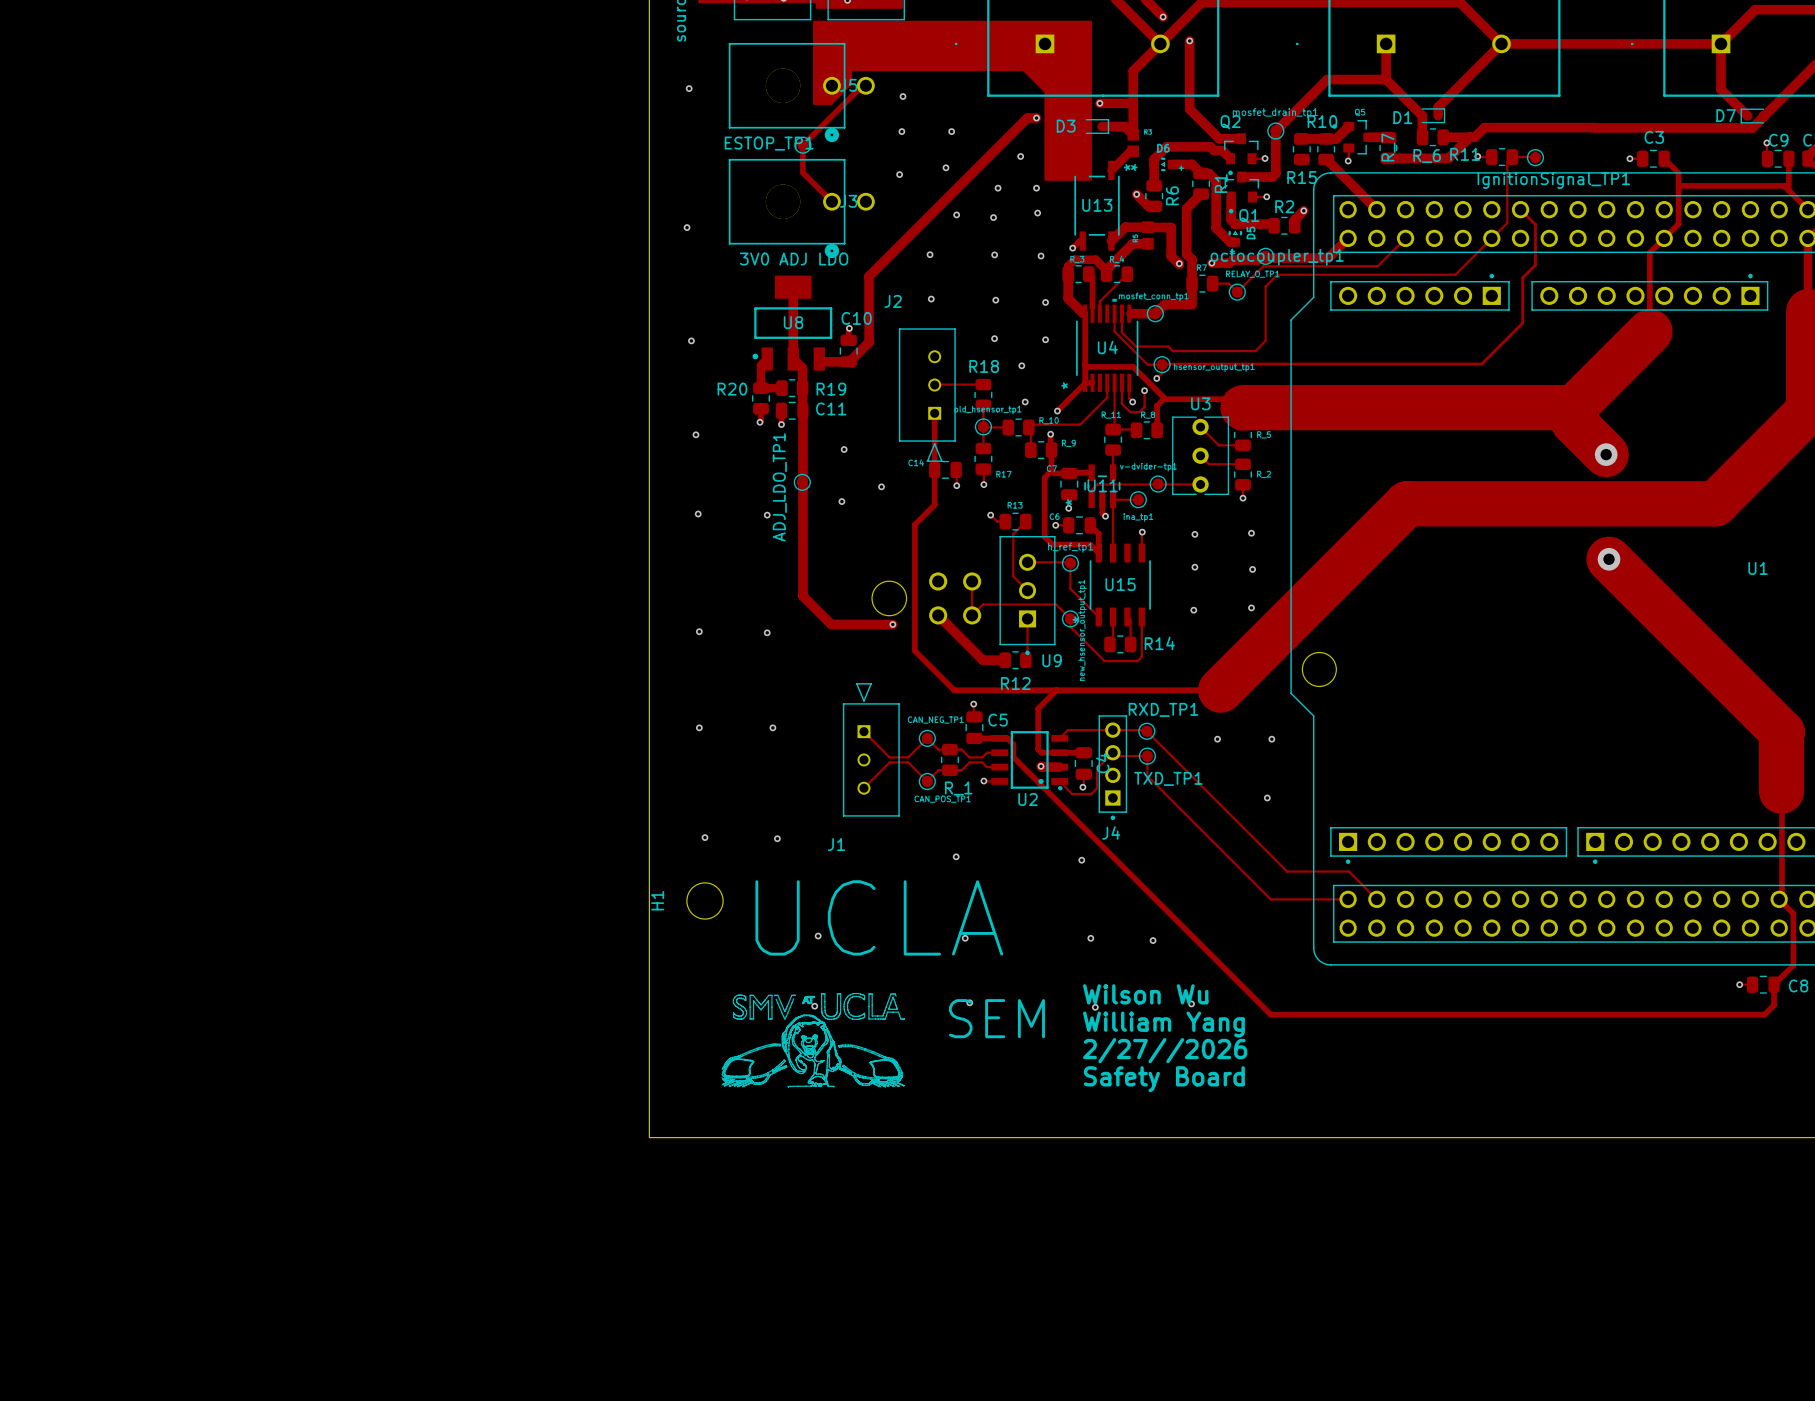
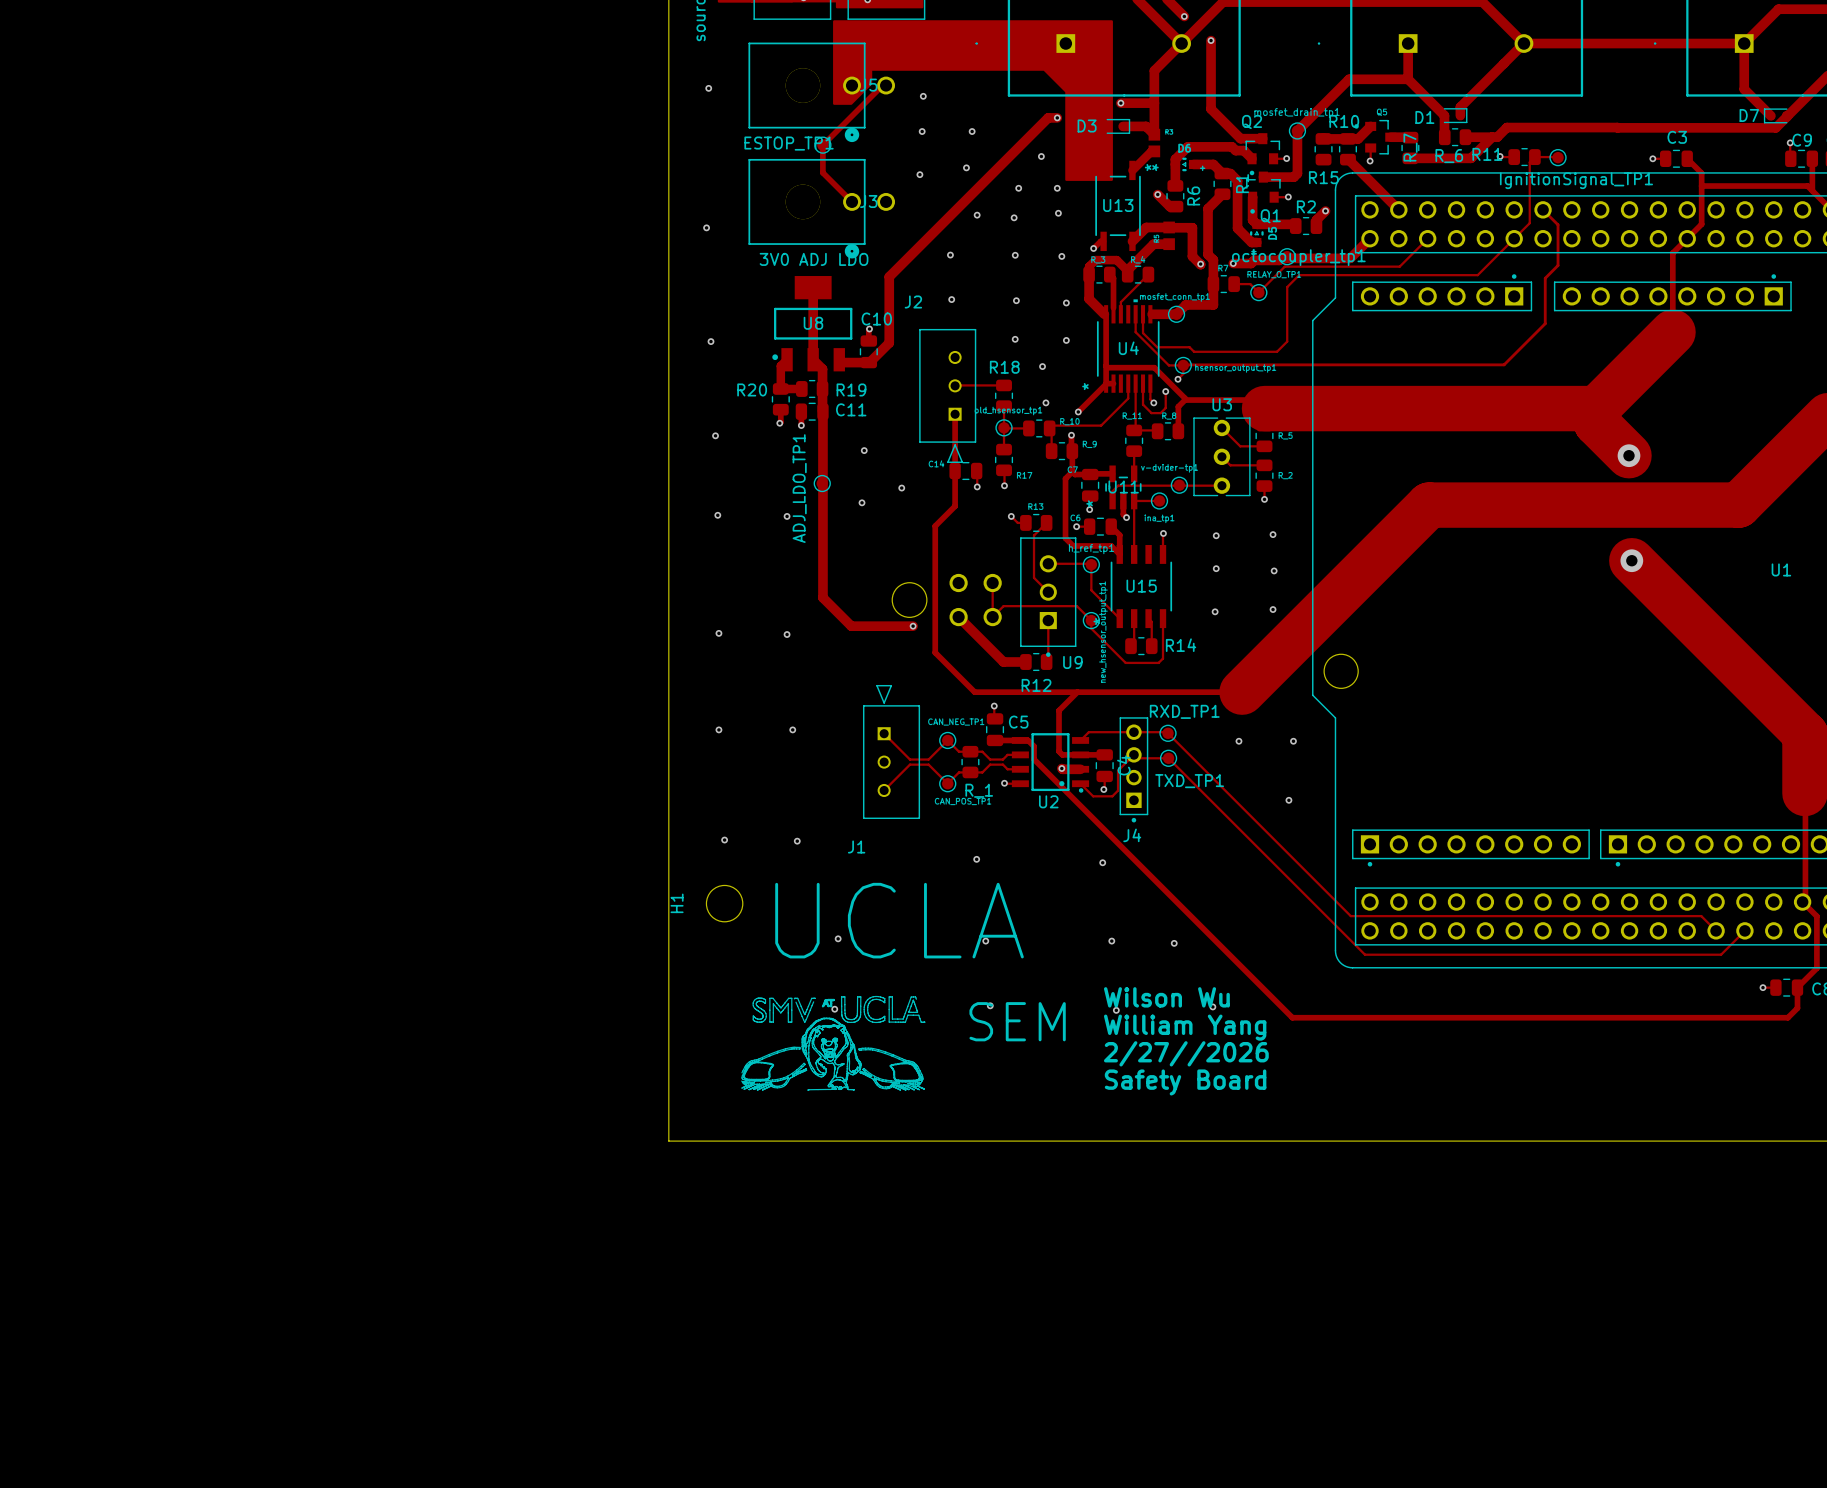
track: (1147, 756) (1147, 775) (1270, 899) (1348, 899) -> (1168, 758) (1365, 954) (1721, 954) (1744, 930)
track: (1287, 871) (1349, 871) (1376, 899) -> (1308, 874) (1350, 916) (1701, 916) (1716, 930)

